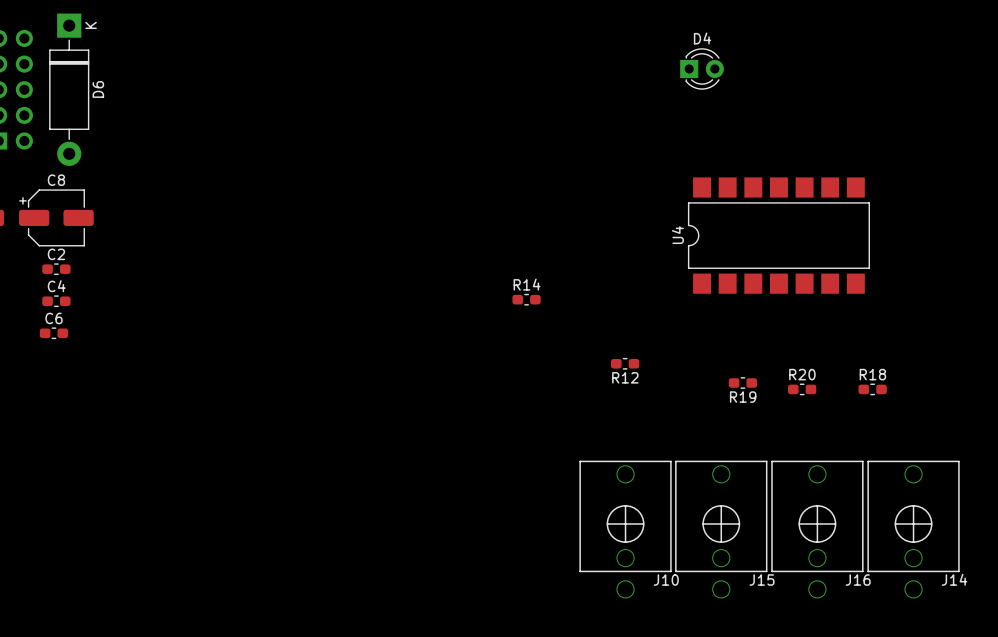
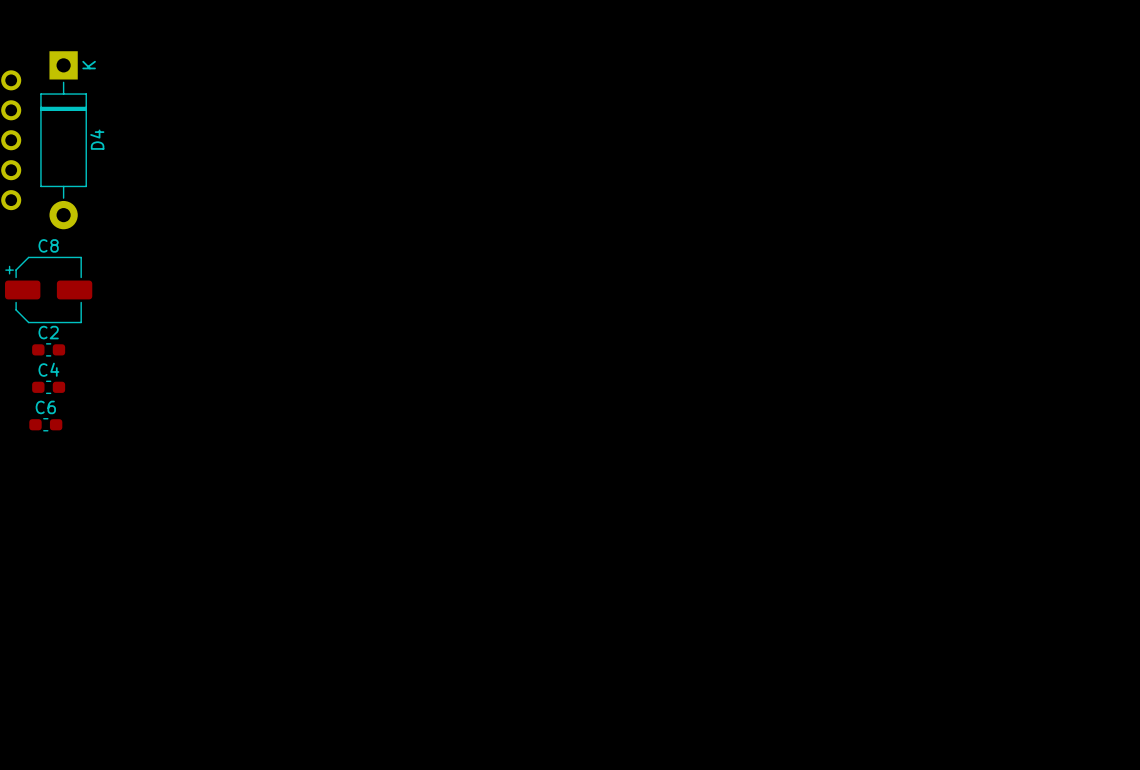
D4: (702, 68) -> none
D6 name: D6 (98, 89) -> D4 (97, 139)
U4: (778, 235) -> none
R14: (526, 299) -> none
R12: (625, 363) -> none
R19: (742, 383) -> none
R20: (802, 389) -> none
R18: (872, 389) -> none
J10: (625, 529) -> none
J15: (721, 529) -> none
J16: (817, 529) -> none
J14: (913, 529) -> none

